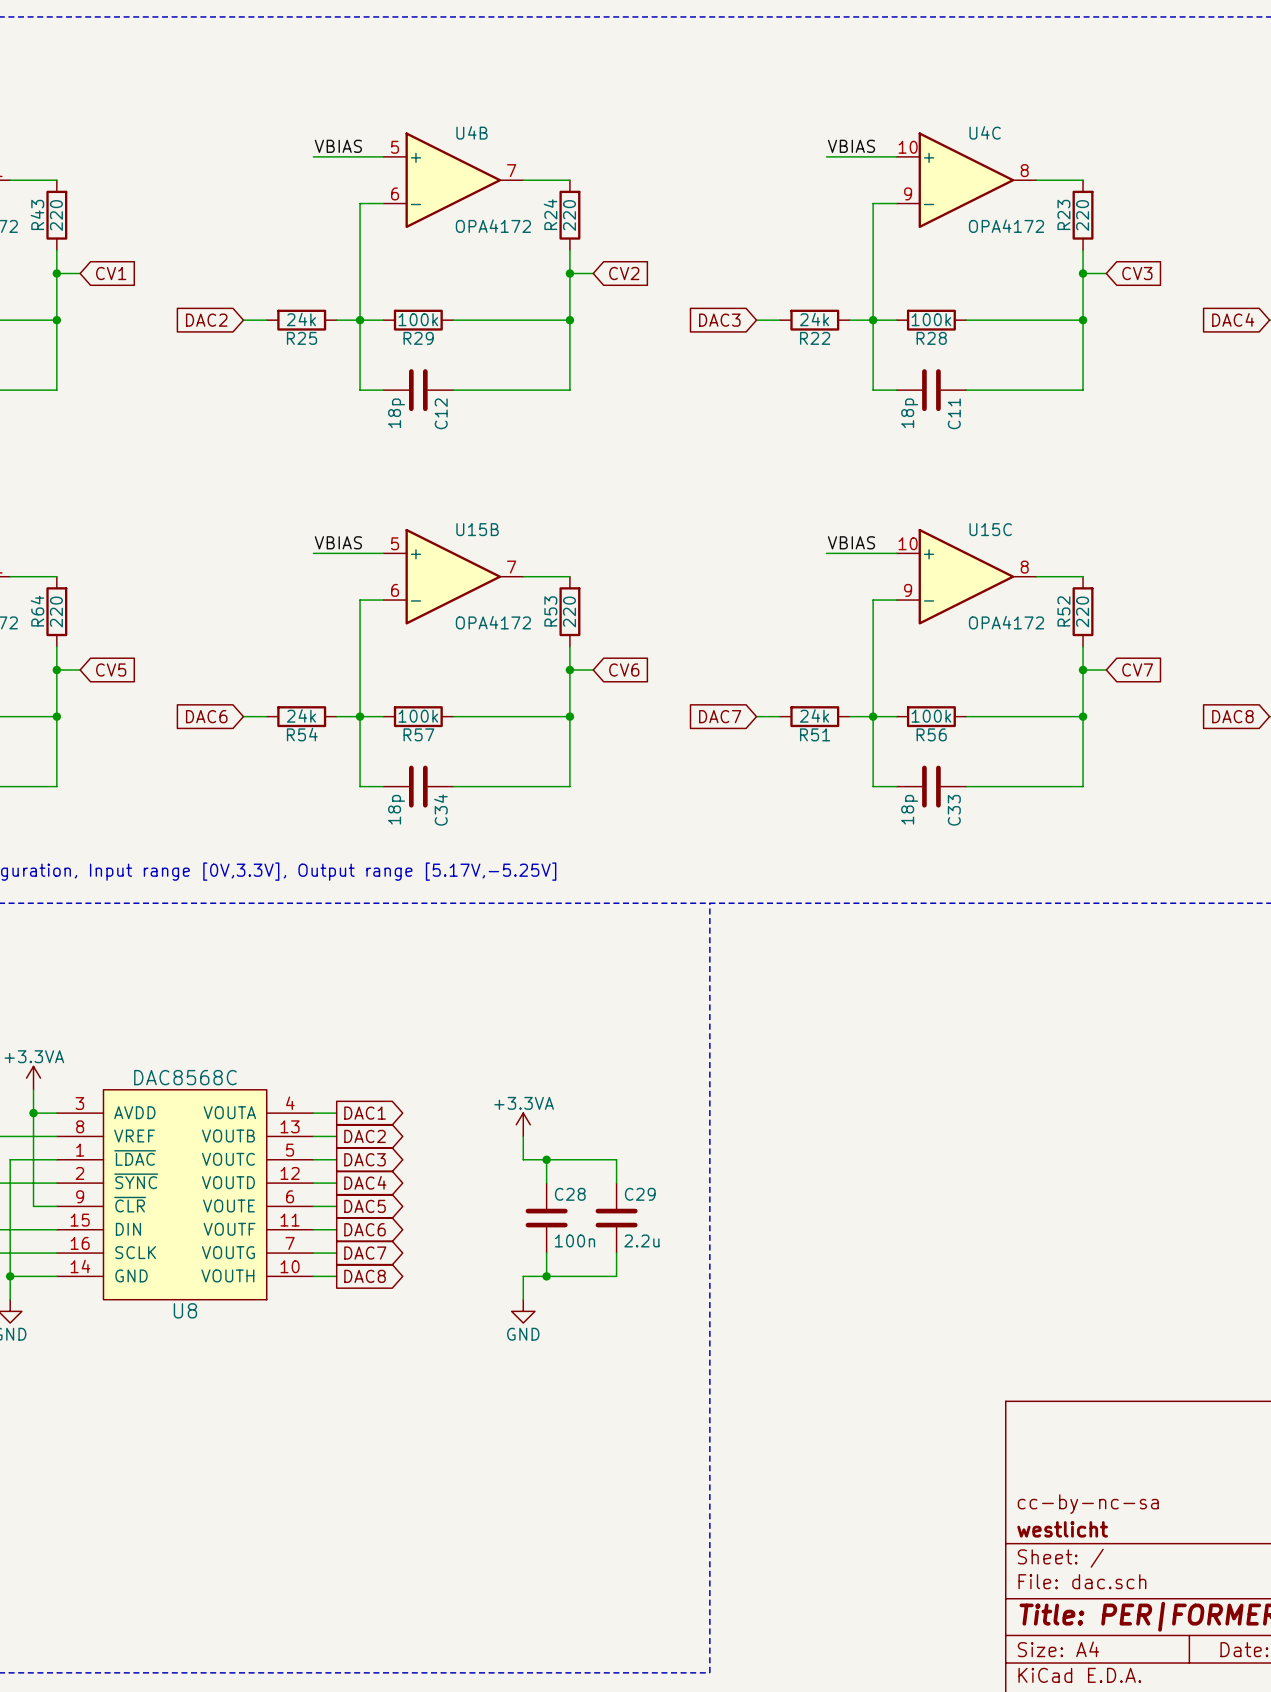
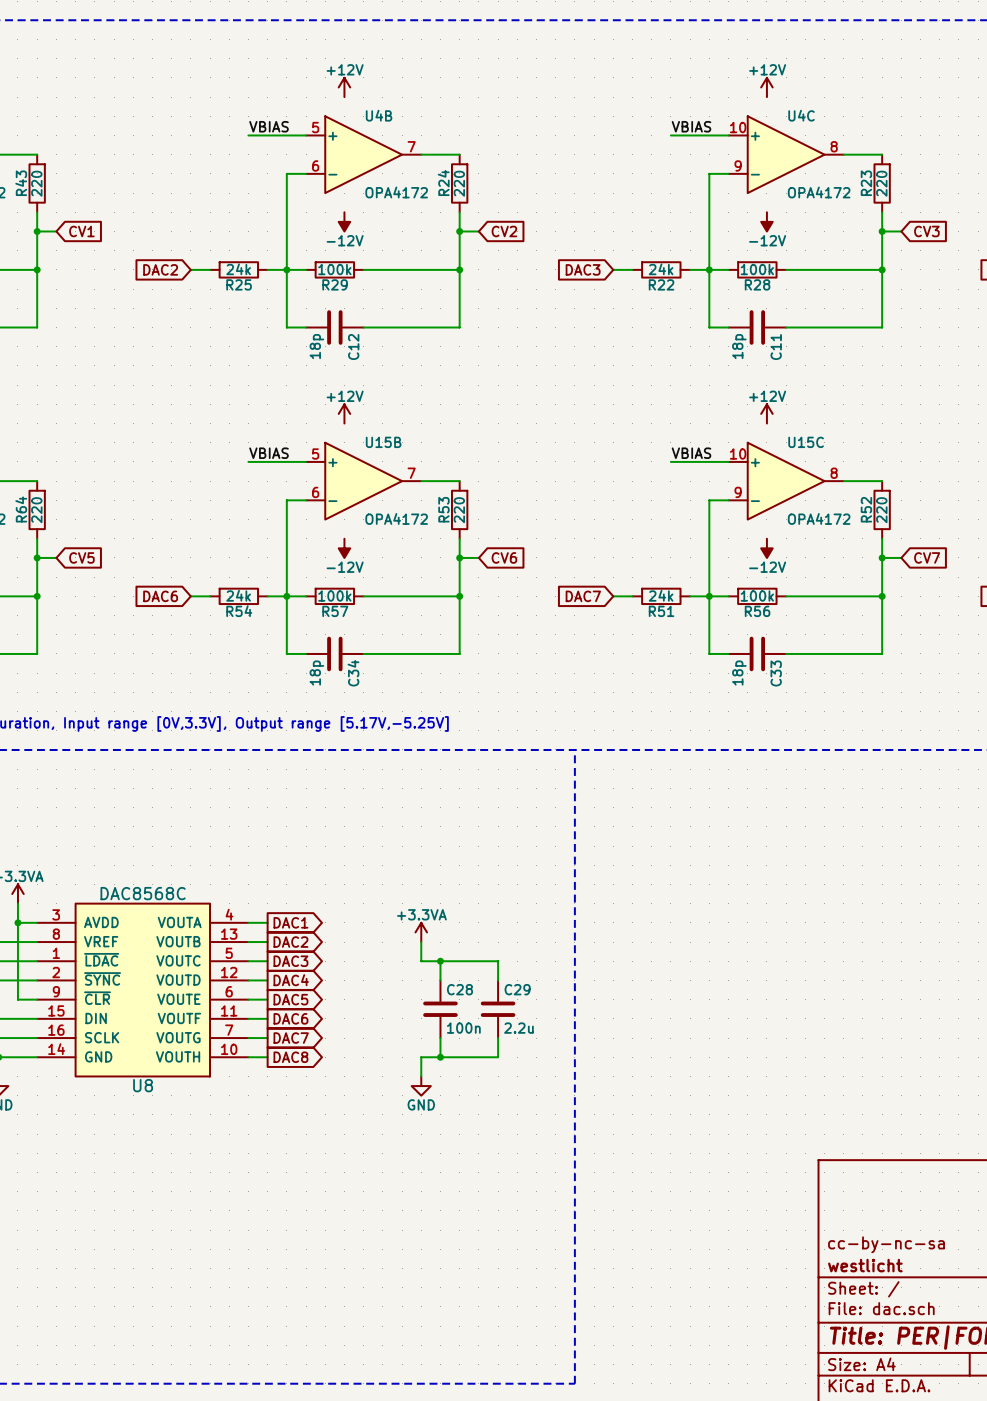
power symbol: none -> +12V (344, 87)
power symbol: none -> +12V (766, 87)
power symbol: none -> -12V (344, 221)
power symbol: none -> -12V (766, 221)
power symbol: none -> +12V (344, 413)
power symbol: none -> +12V (766, 413)
power symbol: none -> -12V (344, 548)
power symbol: none -> -12V (766, 548)

